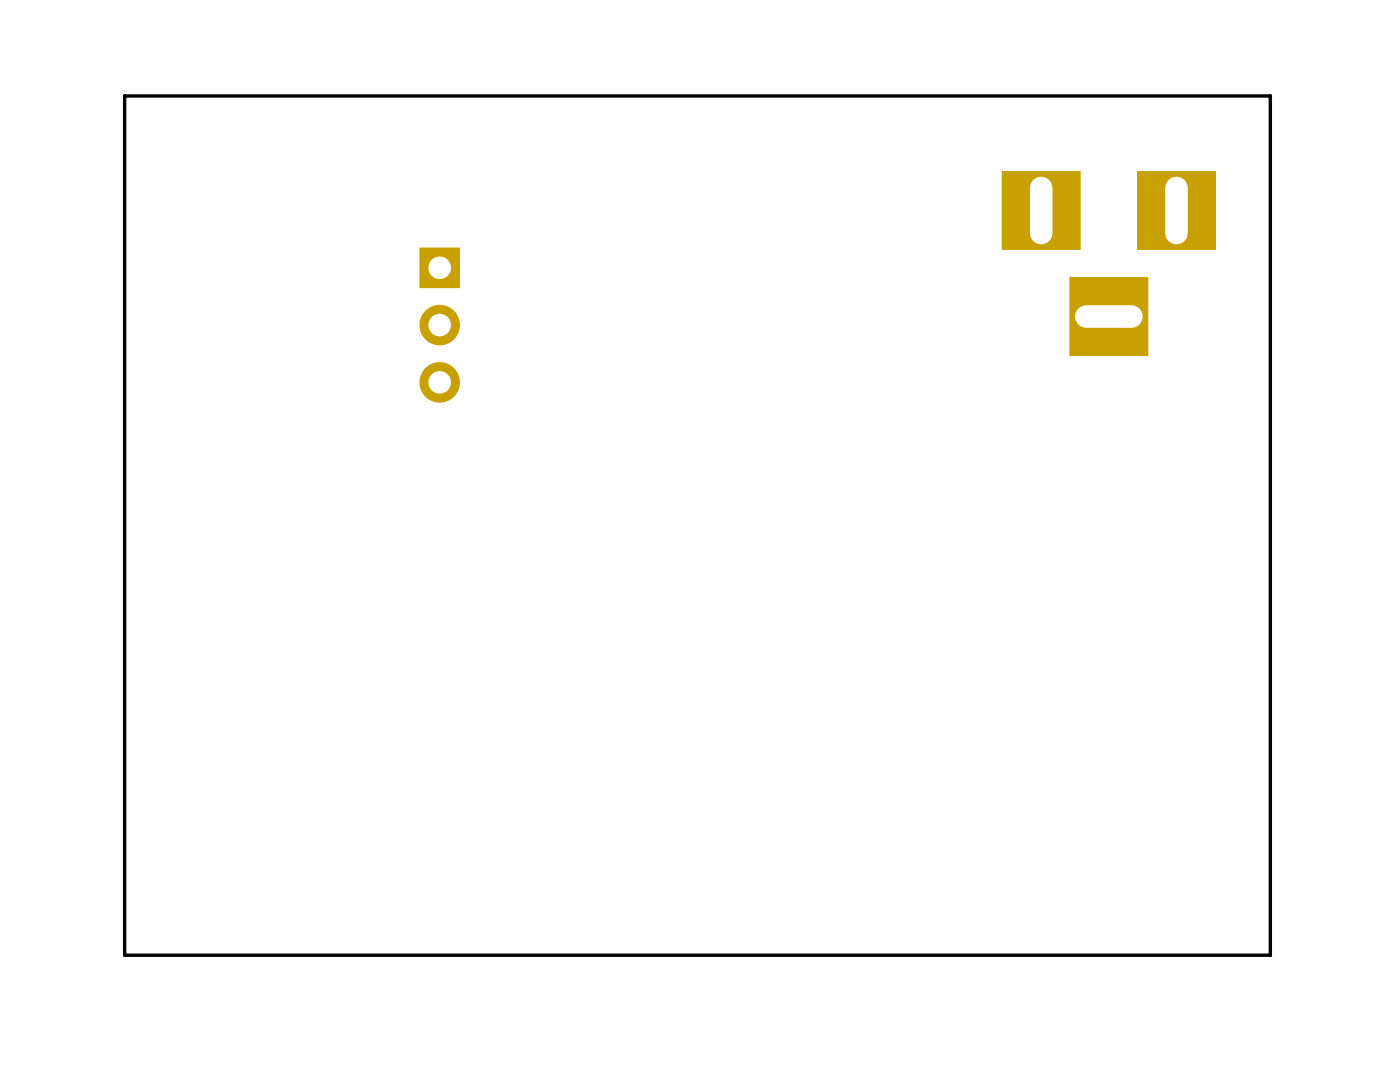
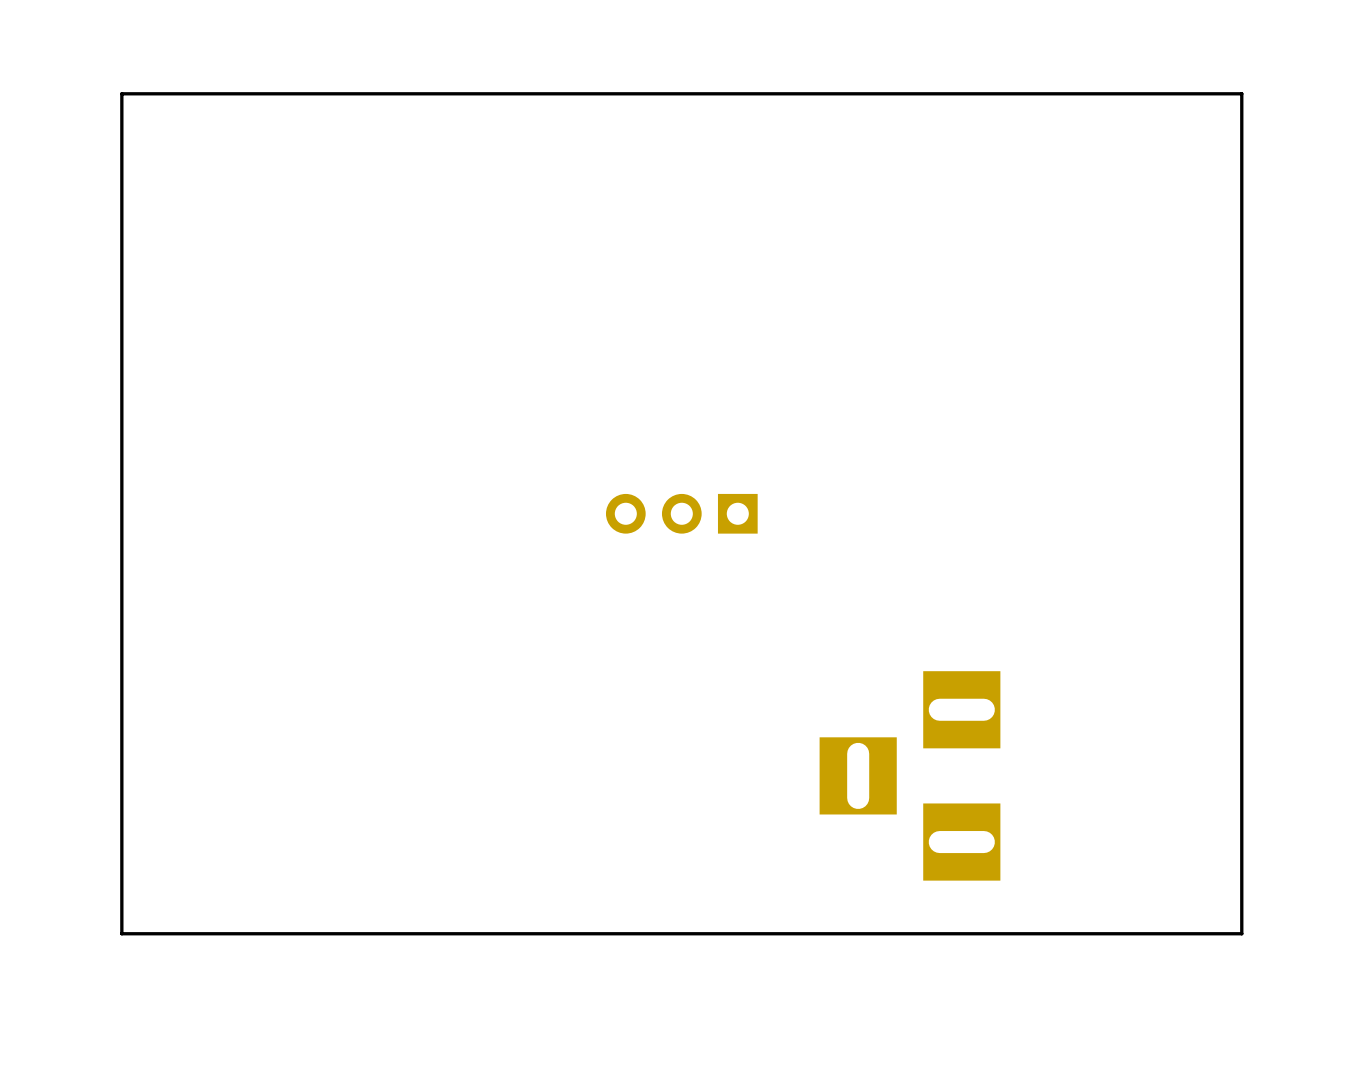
part rotation: 0° (1108, 263) -> 90° clockwise (909, 775)
part position: (1108, 263) -> (909, 775)
part rotation: 0° (439, 325) -> 90° clockwise (681, 513)
part position: (439, 325) -> (681, 513)

